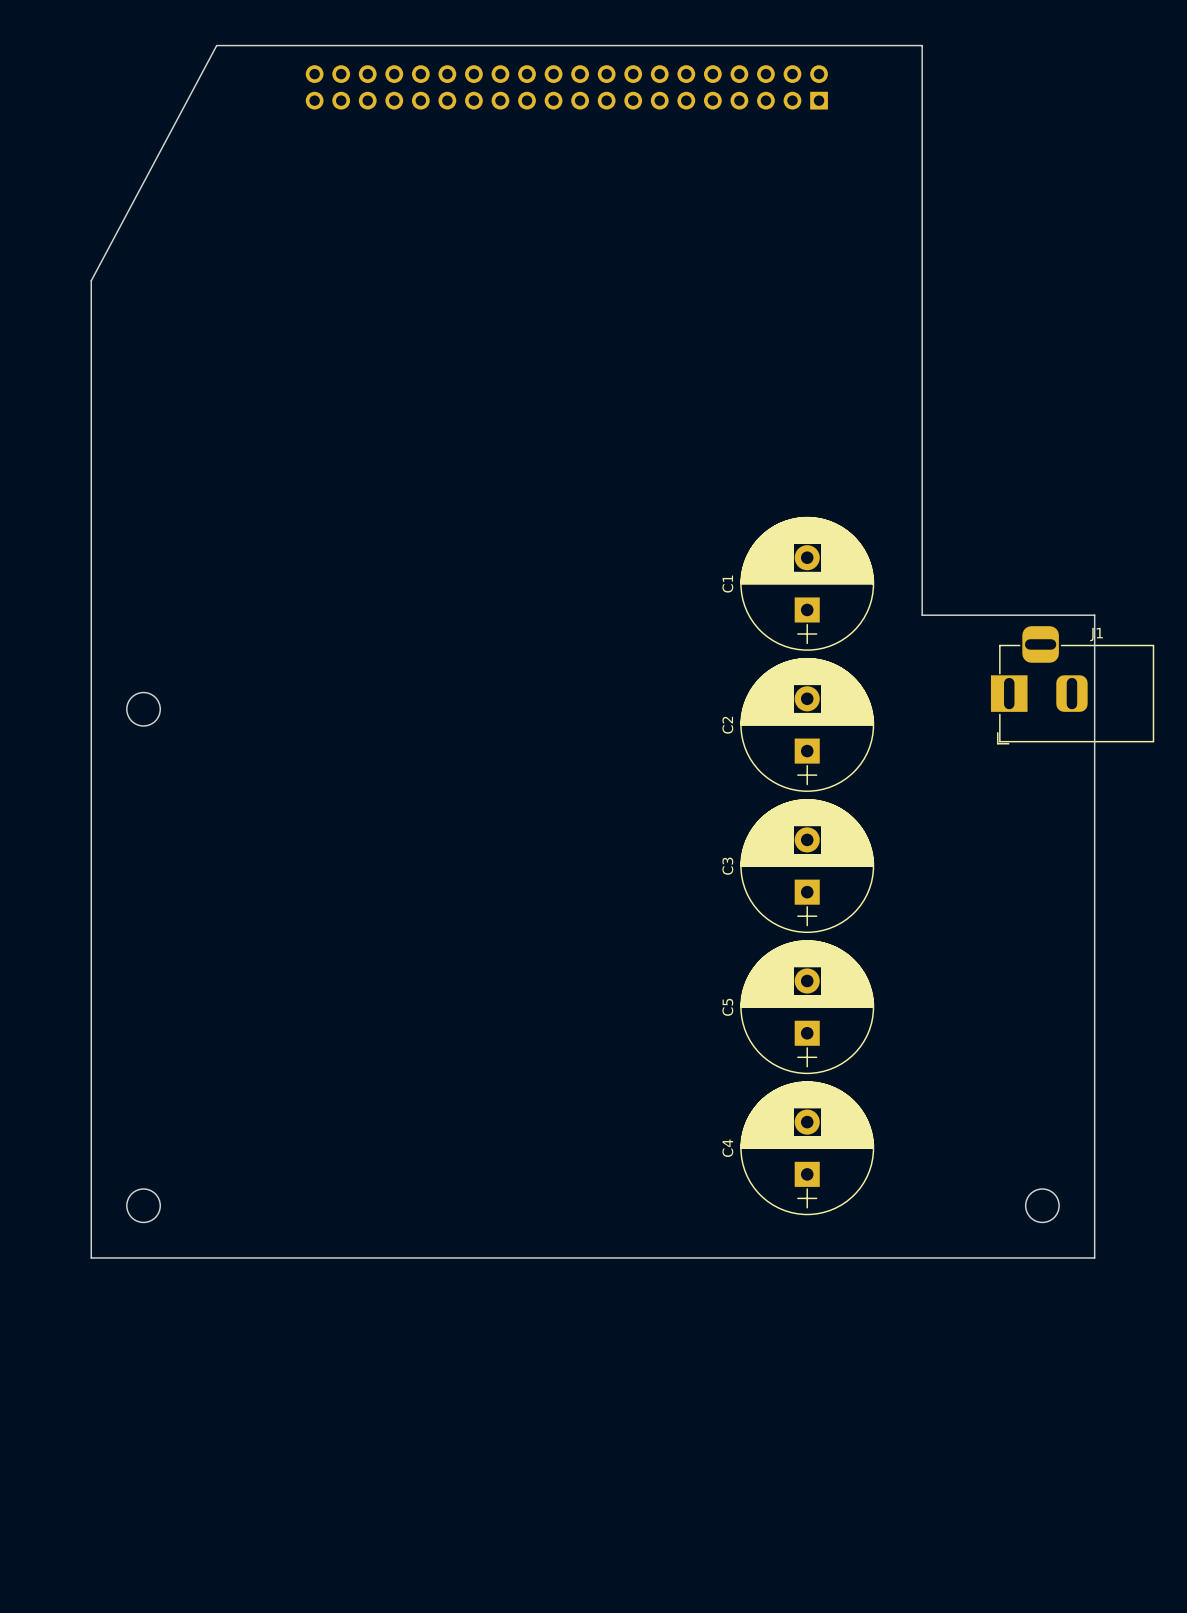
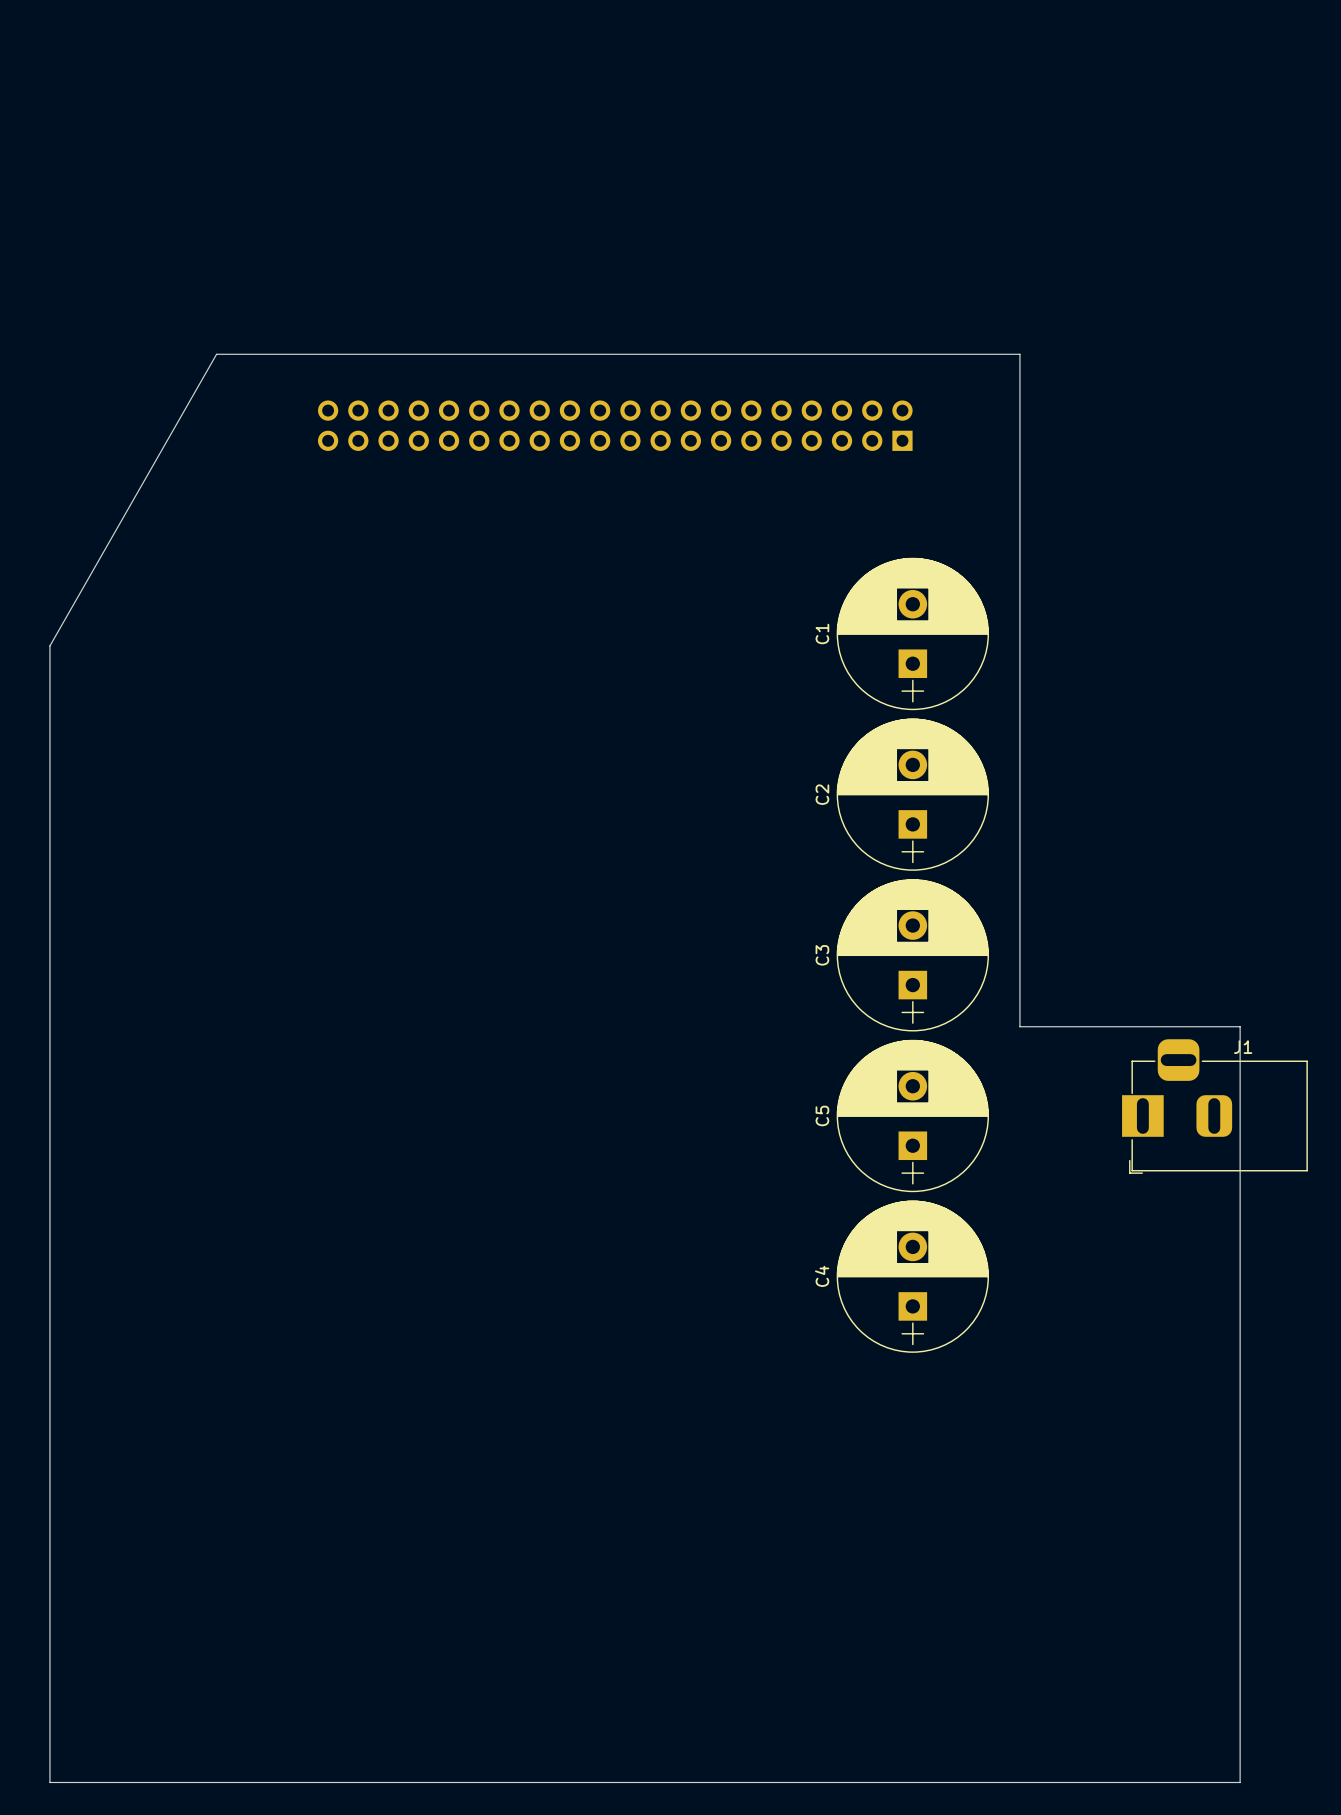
part: (566, 87) -> none
part: none -> (615, 425)
J1 position: (1072, 685) -> (1214, 1106)
round board edge: [126, 692, 161, 727] -> none
board edge: (1094, 928) (1094, 615) (922, 615) (922, 45) (216, 45) (91, 280) (91, 1257) (1094, 1257) -> (1240, 1026) (1019, 1026) (1019, 354) (216, 354) (49, 645) (49, 1782) (1240, 1782) (1240, 1401)
round board edge: [126, 1188, 161, 1223] -> none
round board edge: [1025, 1188, 1060, 1223] -> none

